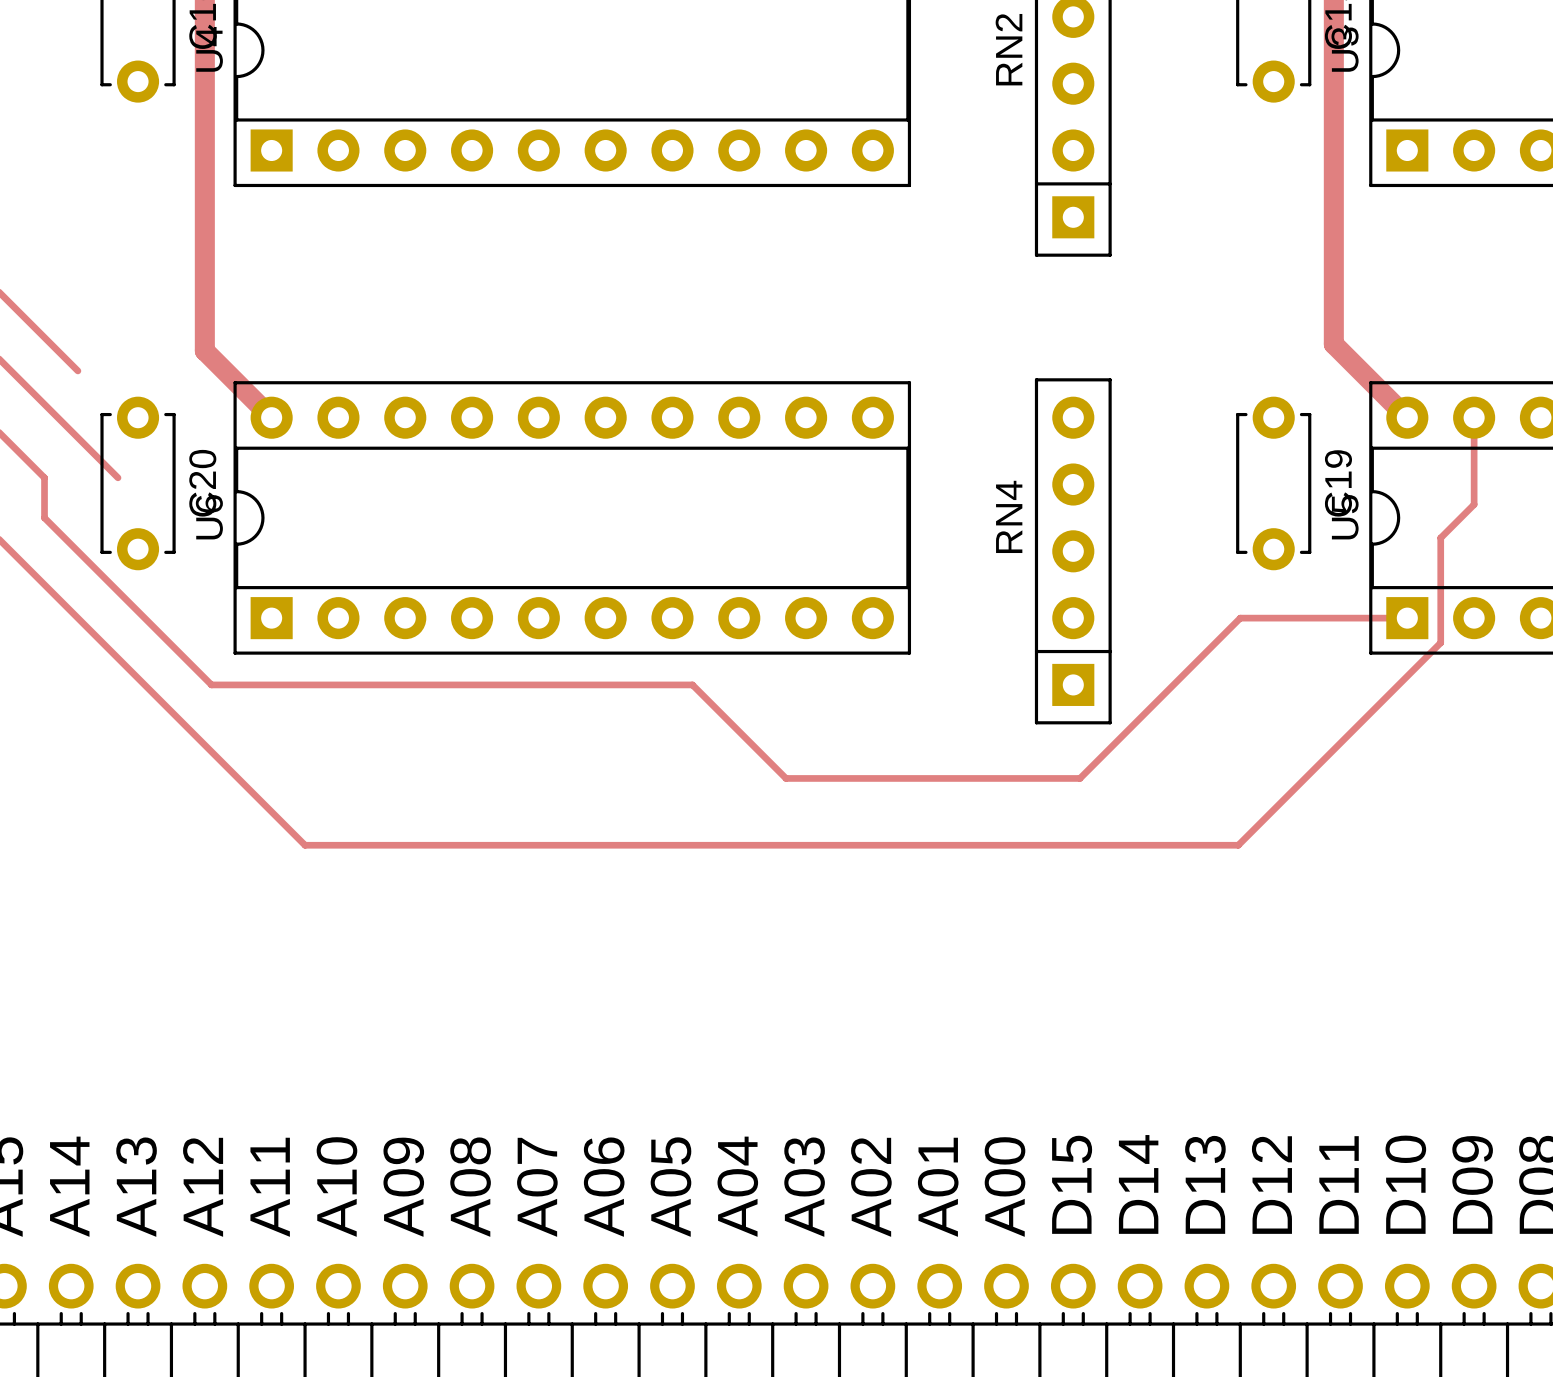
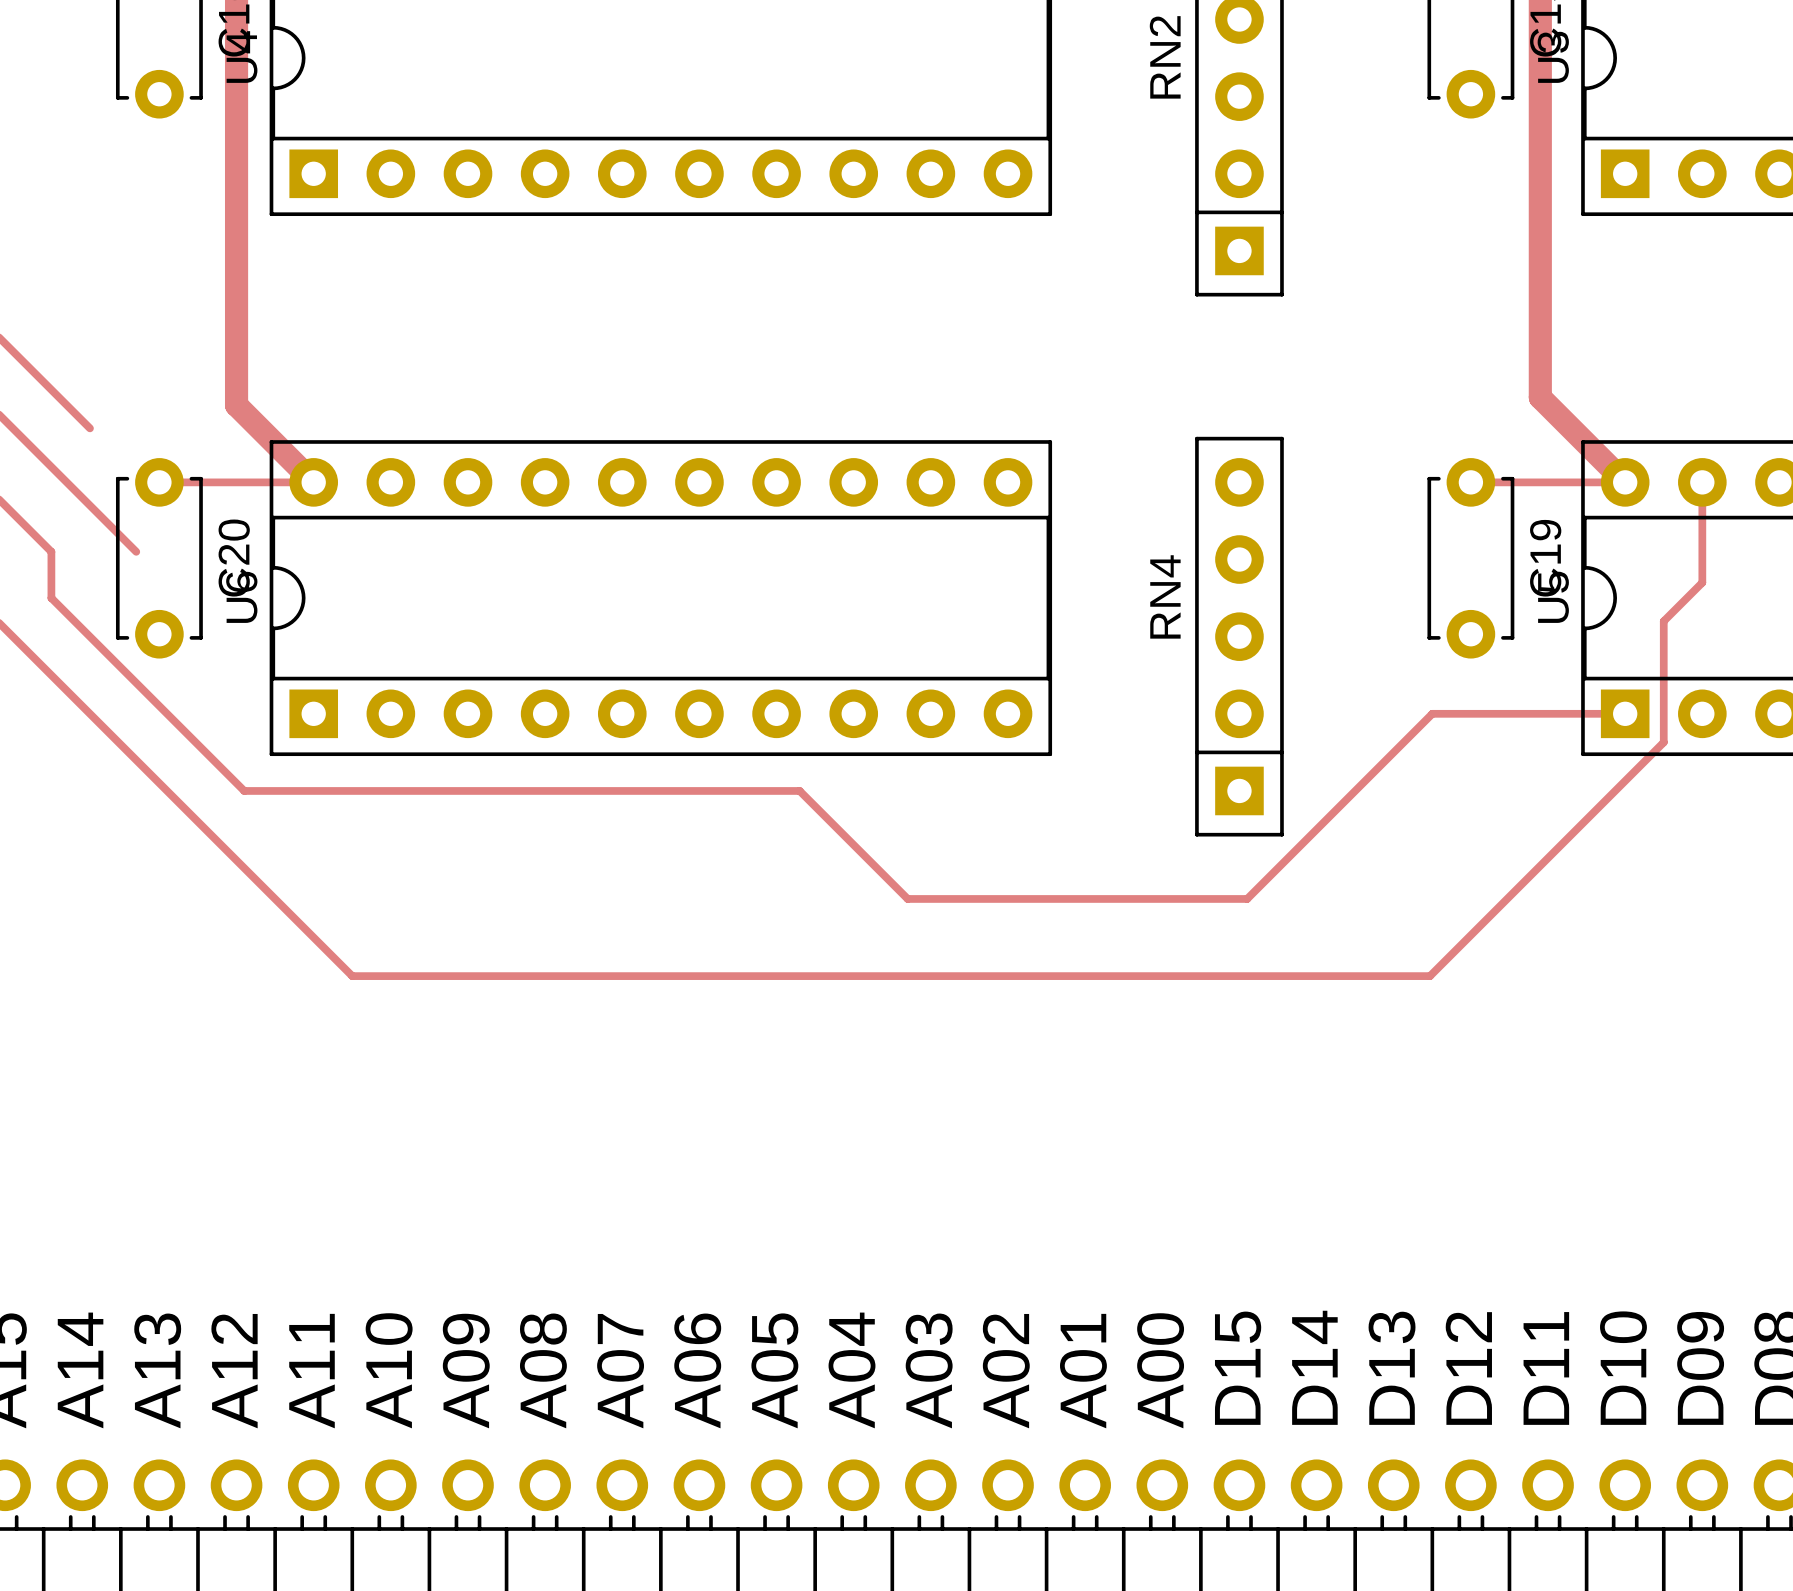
track: none -> (159, 482) (313, 482)
track: none -> (1470, 482) (1625, 482)

